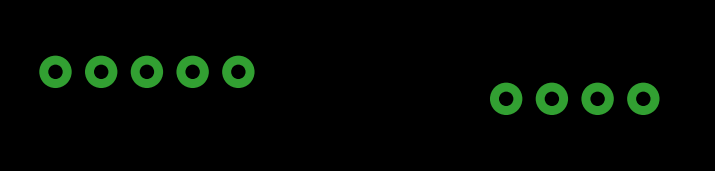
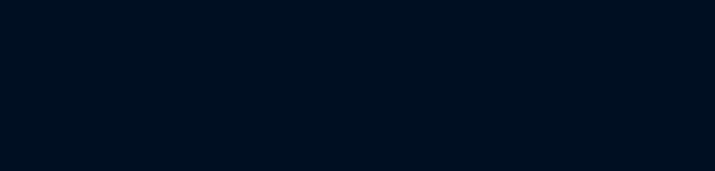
part: (146, 71) -> none
part: (574, 98) -> none

